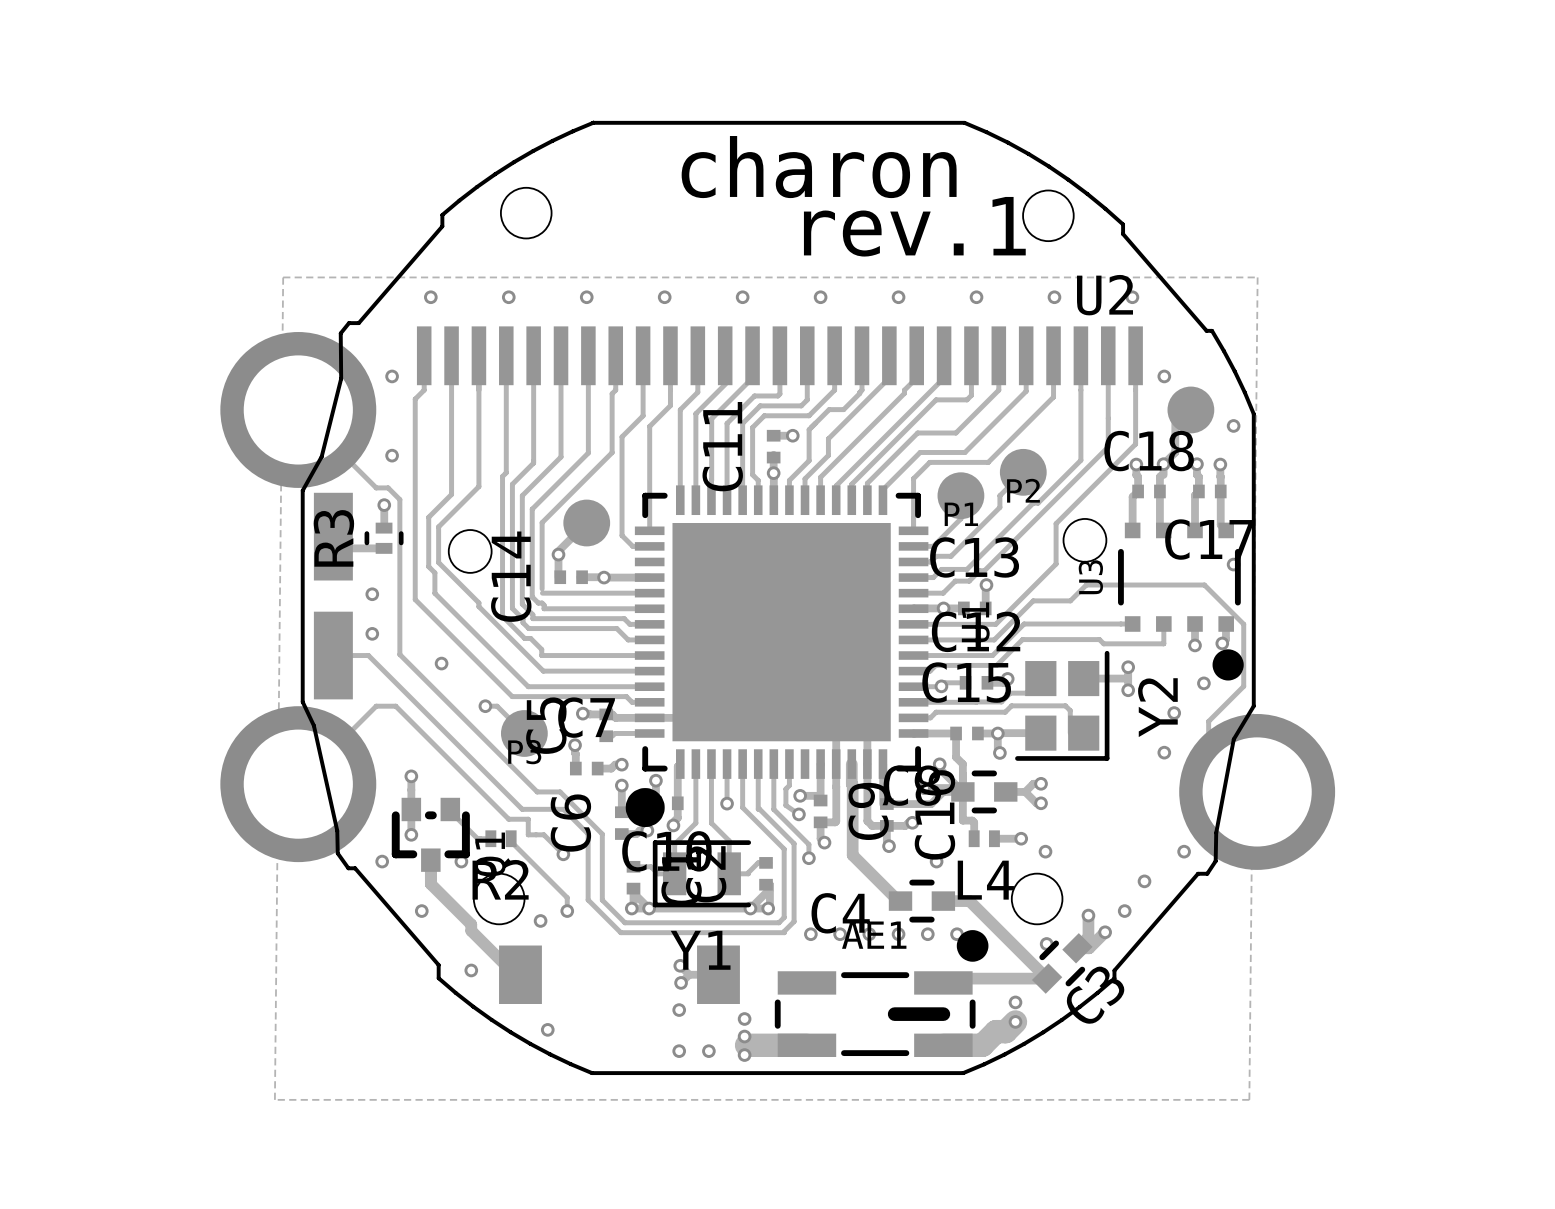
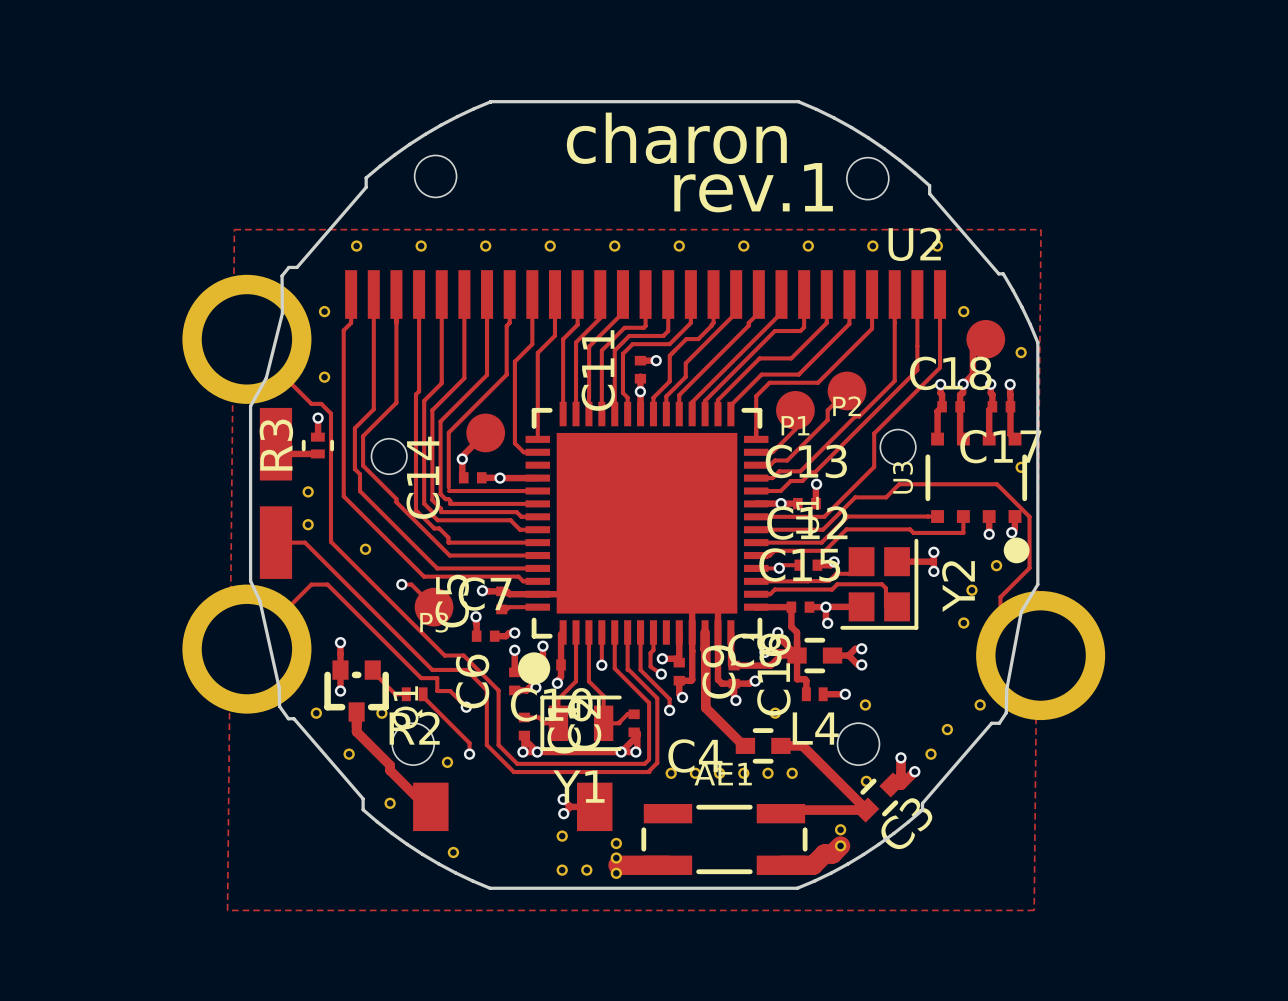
AE1 footprint: [774, 930, 989, 1058] -> [641, 803, 808, 875]

